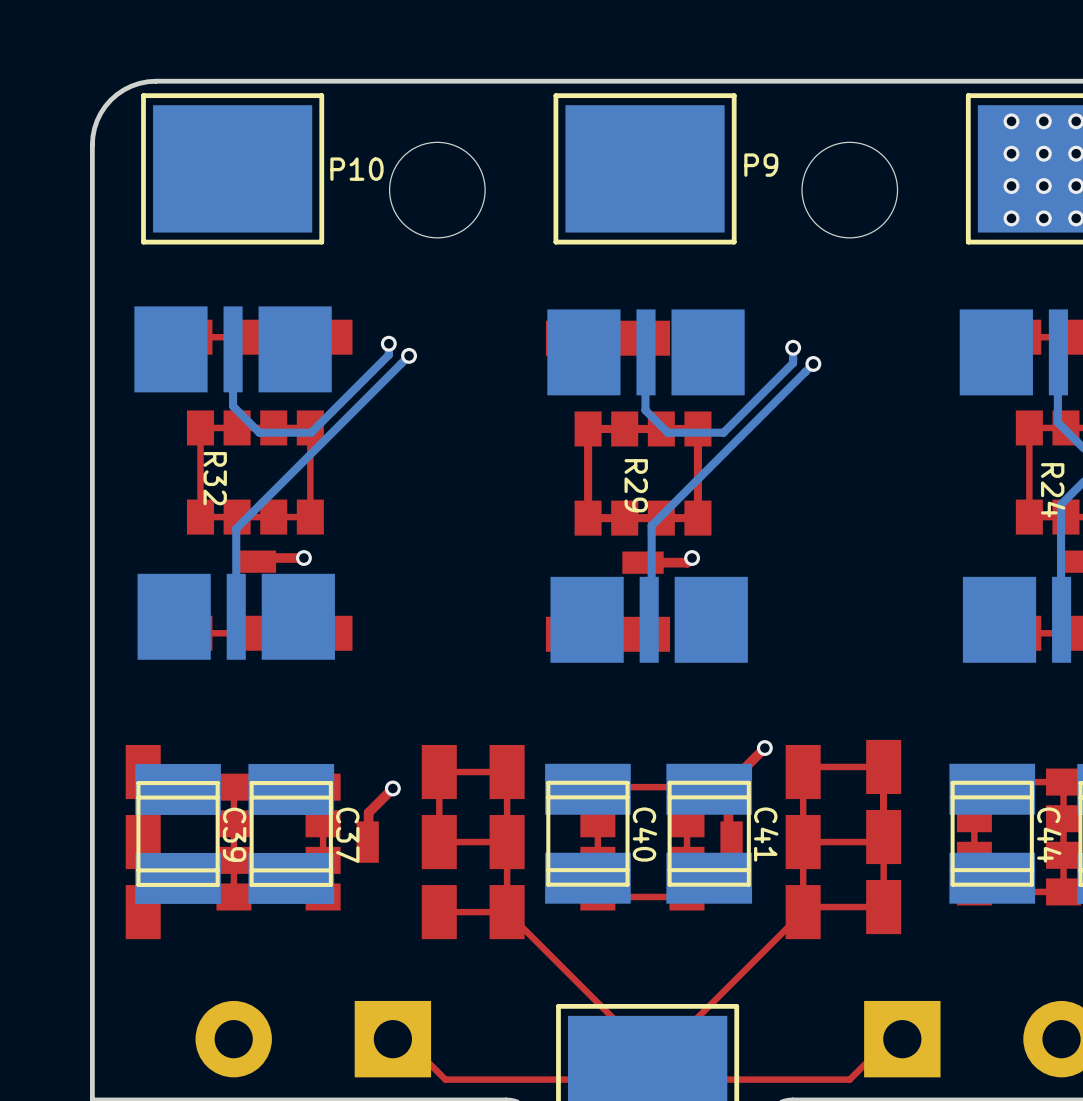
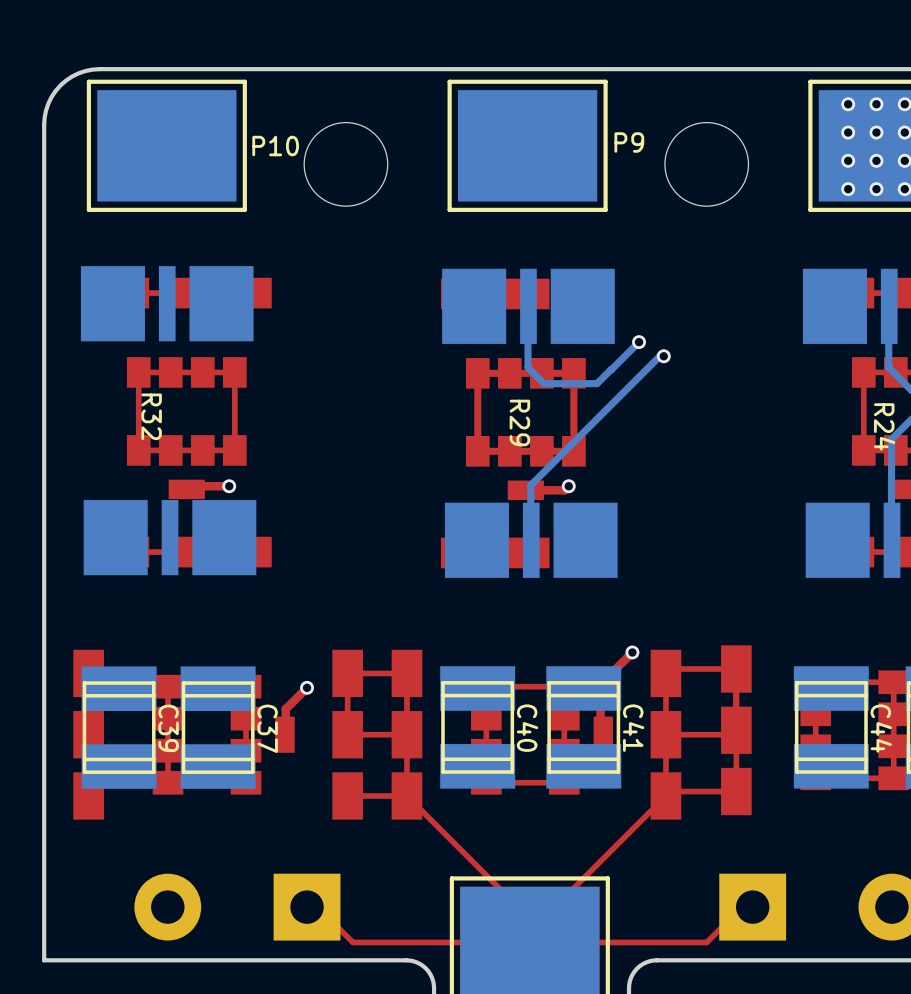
bottom track: (388, 343) (388, 354) (311, 432) (259, 432) (233, 406) (233, 349) -> none
via: (388, 343) -> none
bottom track: (793, 347) (793, 363) (723, 432) (667, 432) (645, 410) -> (610, 369) (597, 383) (544, 383) (528, 367) (528, 357)
via: (793, 347) -> none
bottom track: (409, 355) (236, 528) (236, 616) -> none
via: (409, 355) -> none
bottom track: (813, 363) (651, 525) (651, 617) -> (663, 356) (659, 356) (530, 485) (530, 541) (533, 538)
via: (813, 363) -> none
bottom track: none -> (639, 342) (611, 369)
via: none -> (639, 342)
via: none -> (663, 356)

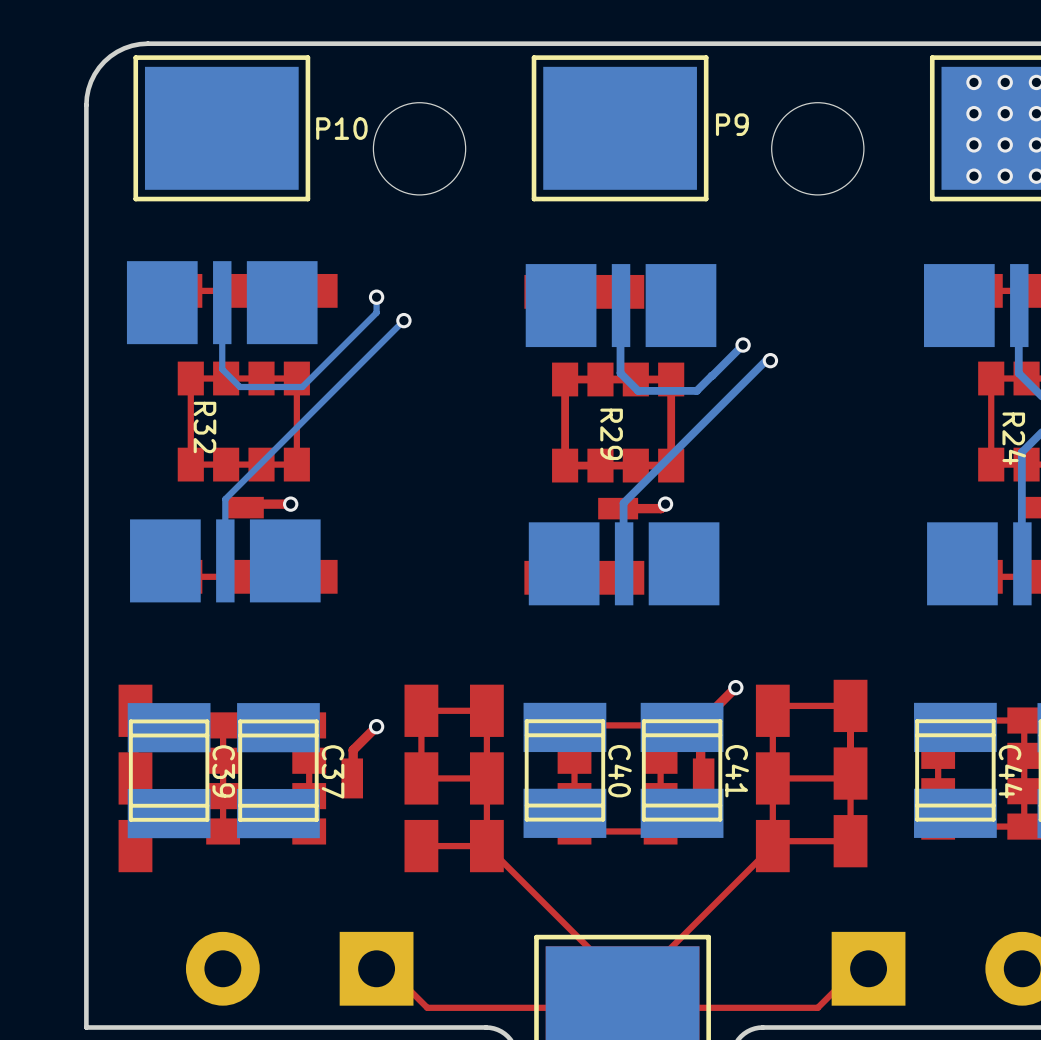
bottom track: none -> (376, 297) (376, 312) (302, 387) (239, 387) (222, 369) (222, 302)
via: none -> (376, 297)
bottom track: none -> (403, 320) (225, 499) (225, 560)
via: none -> (403, 320)

